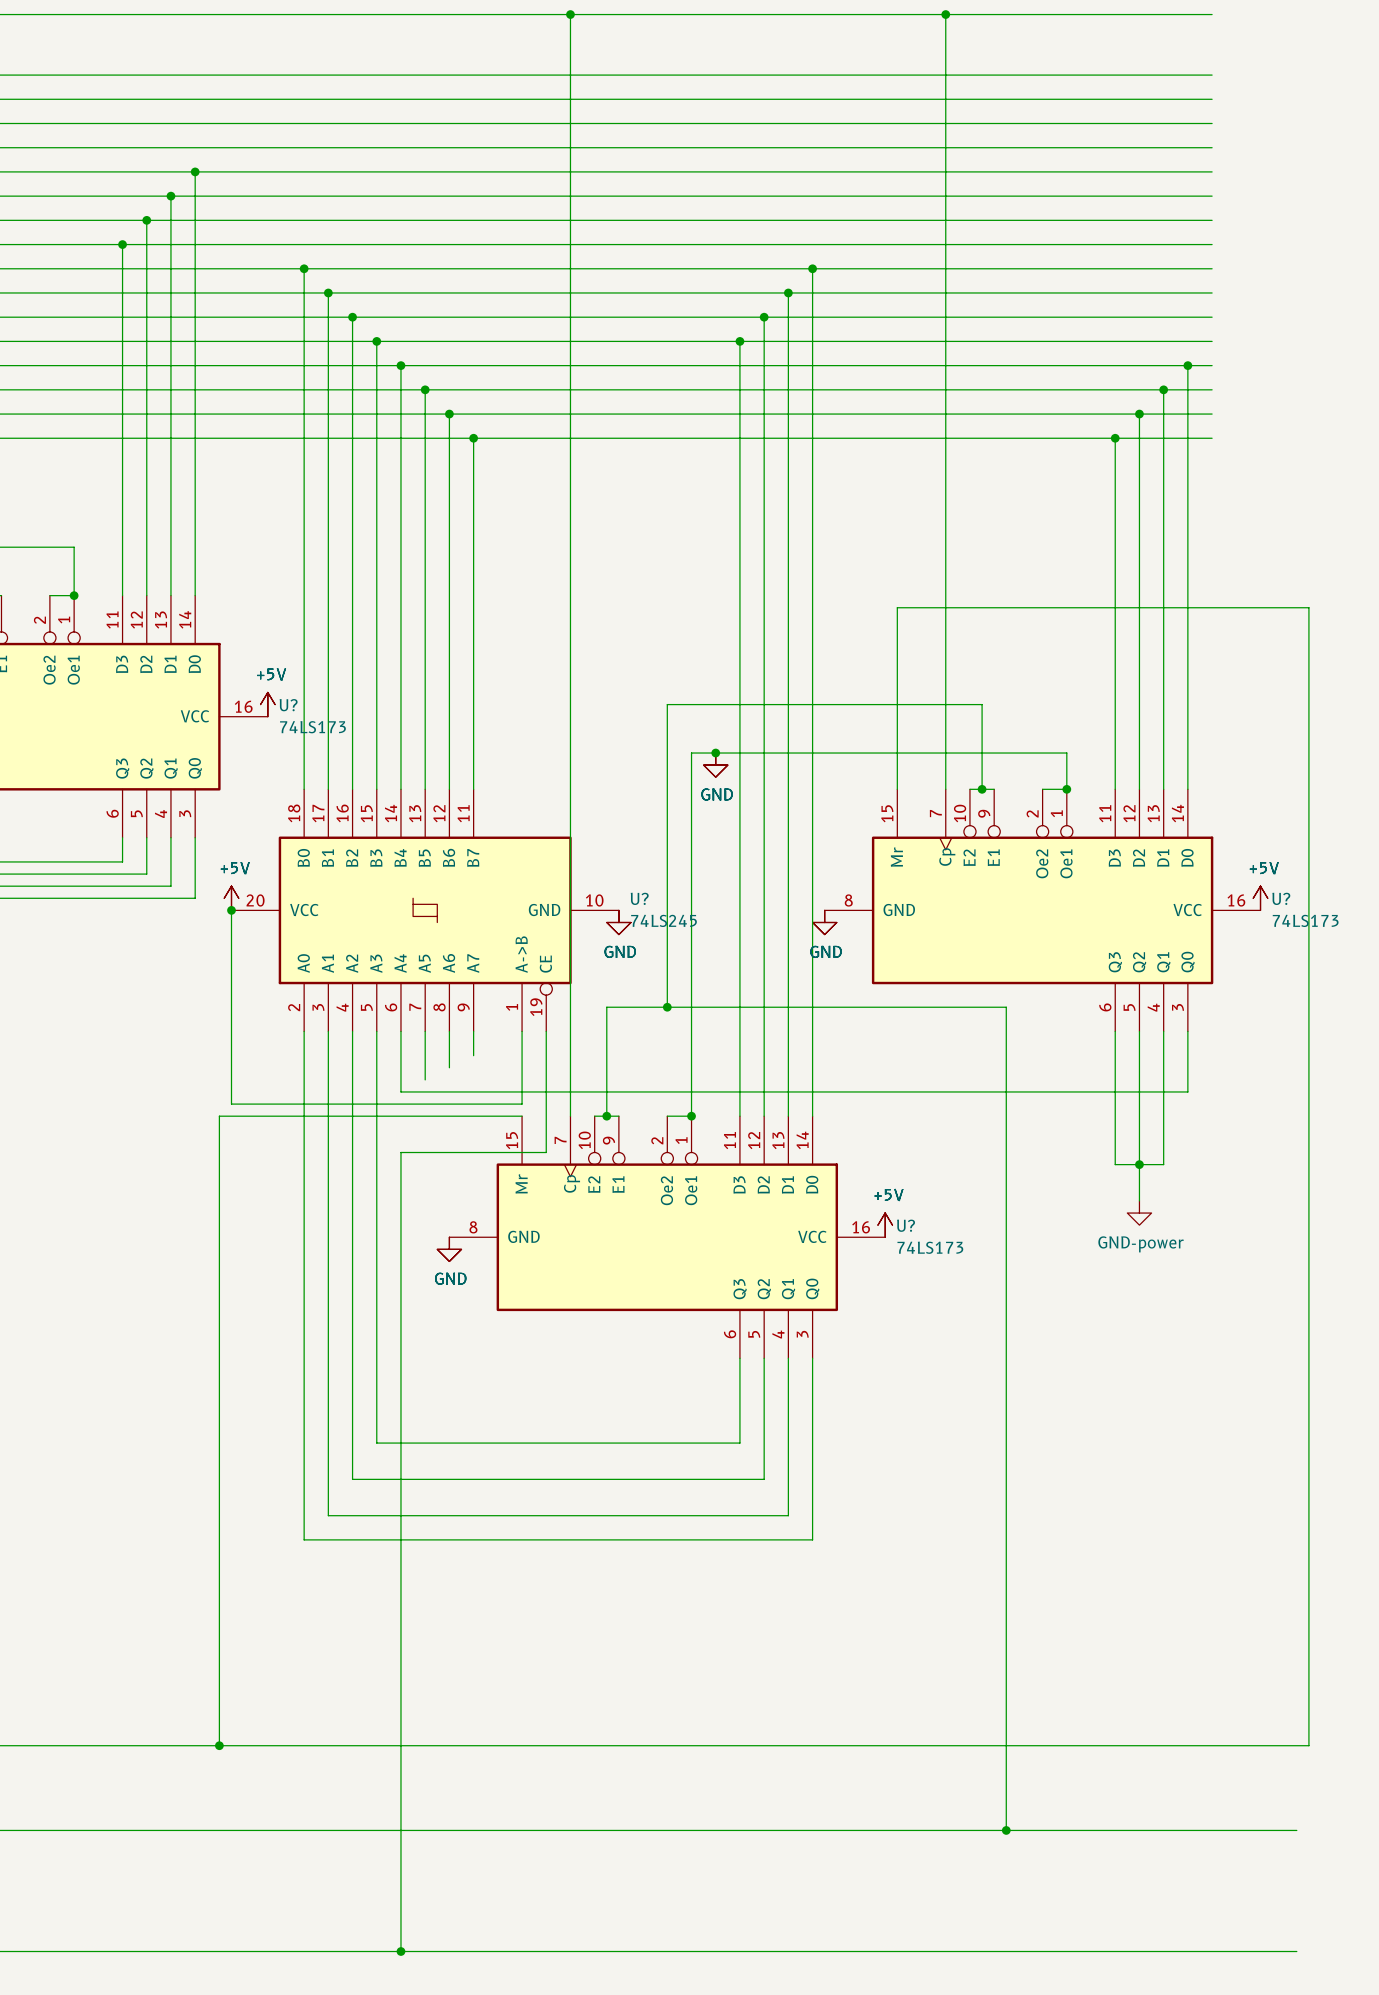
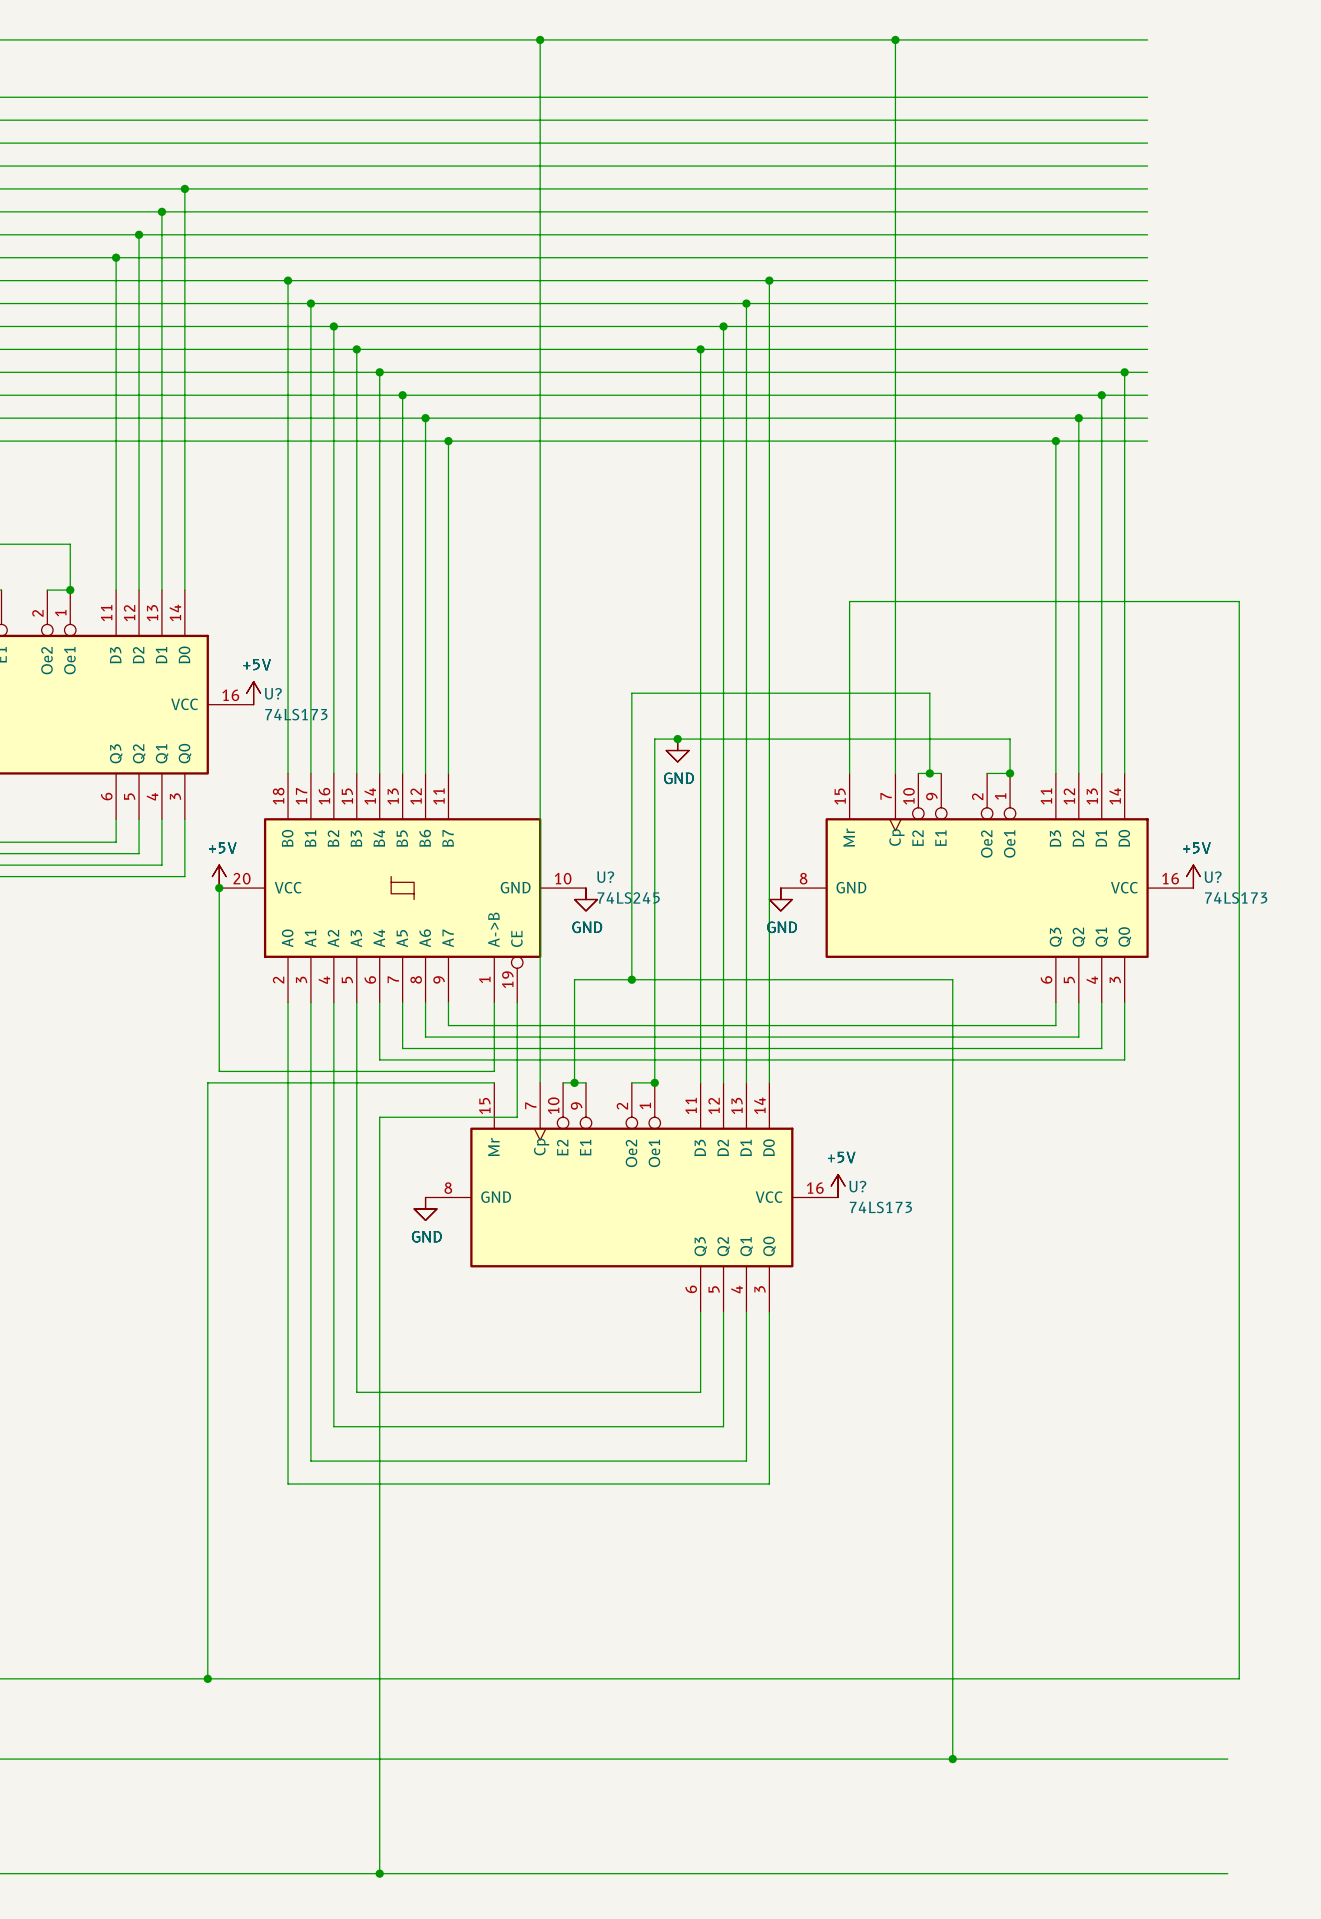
wire: (1115, 1055) (1115, 1164) (1163, 1164) (1163, 1079) -> (1055, 1025) (448, 1025)
wire: (1139, 1067) (1139, 1200) -> (1078, 1037) (425, 1037)
wire: none -> (402, 1048) (1101, 1048)
junction: (1139, 1164) -> none
power symbol: GND-power (1139, 1213) -> none

